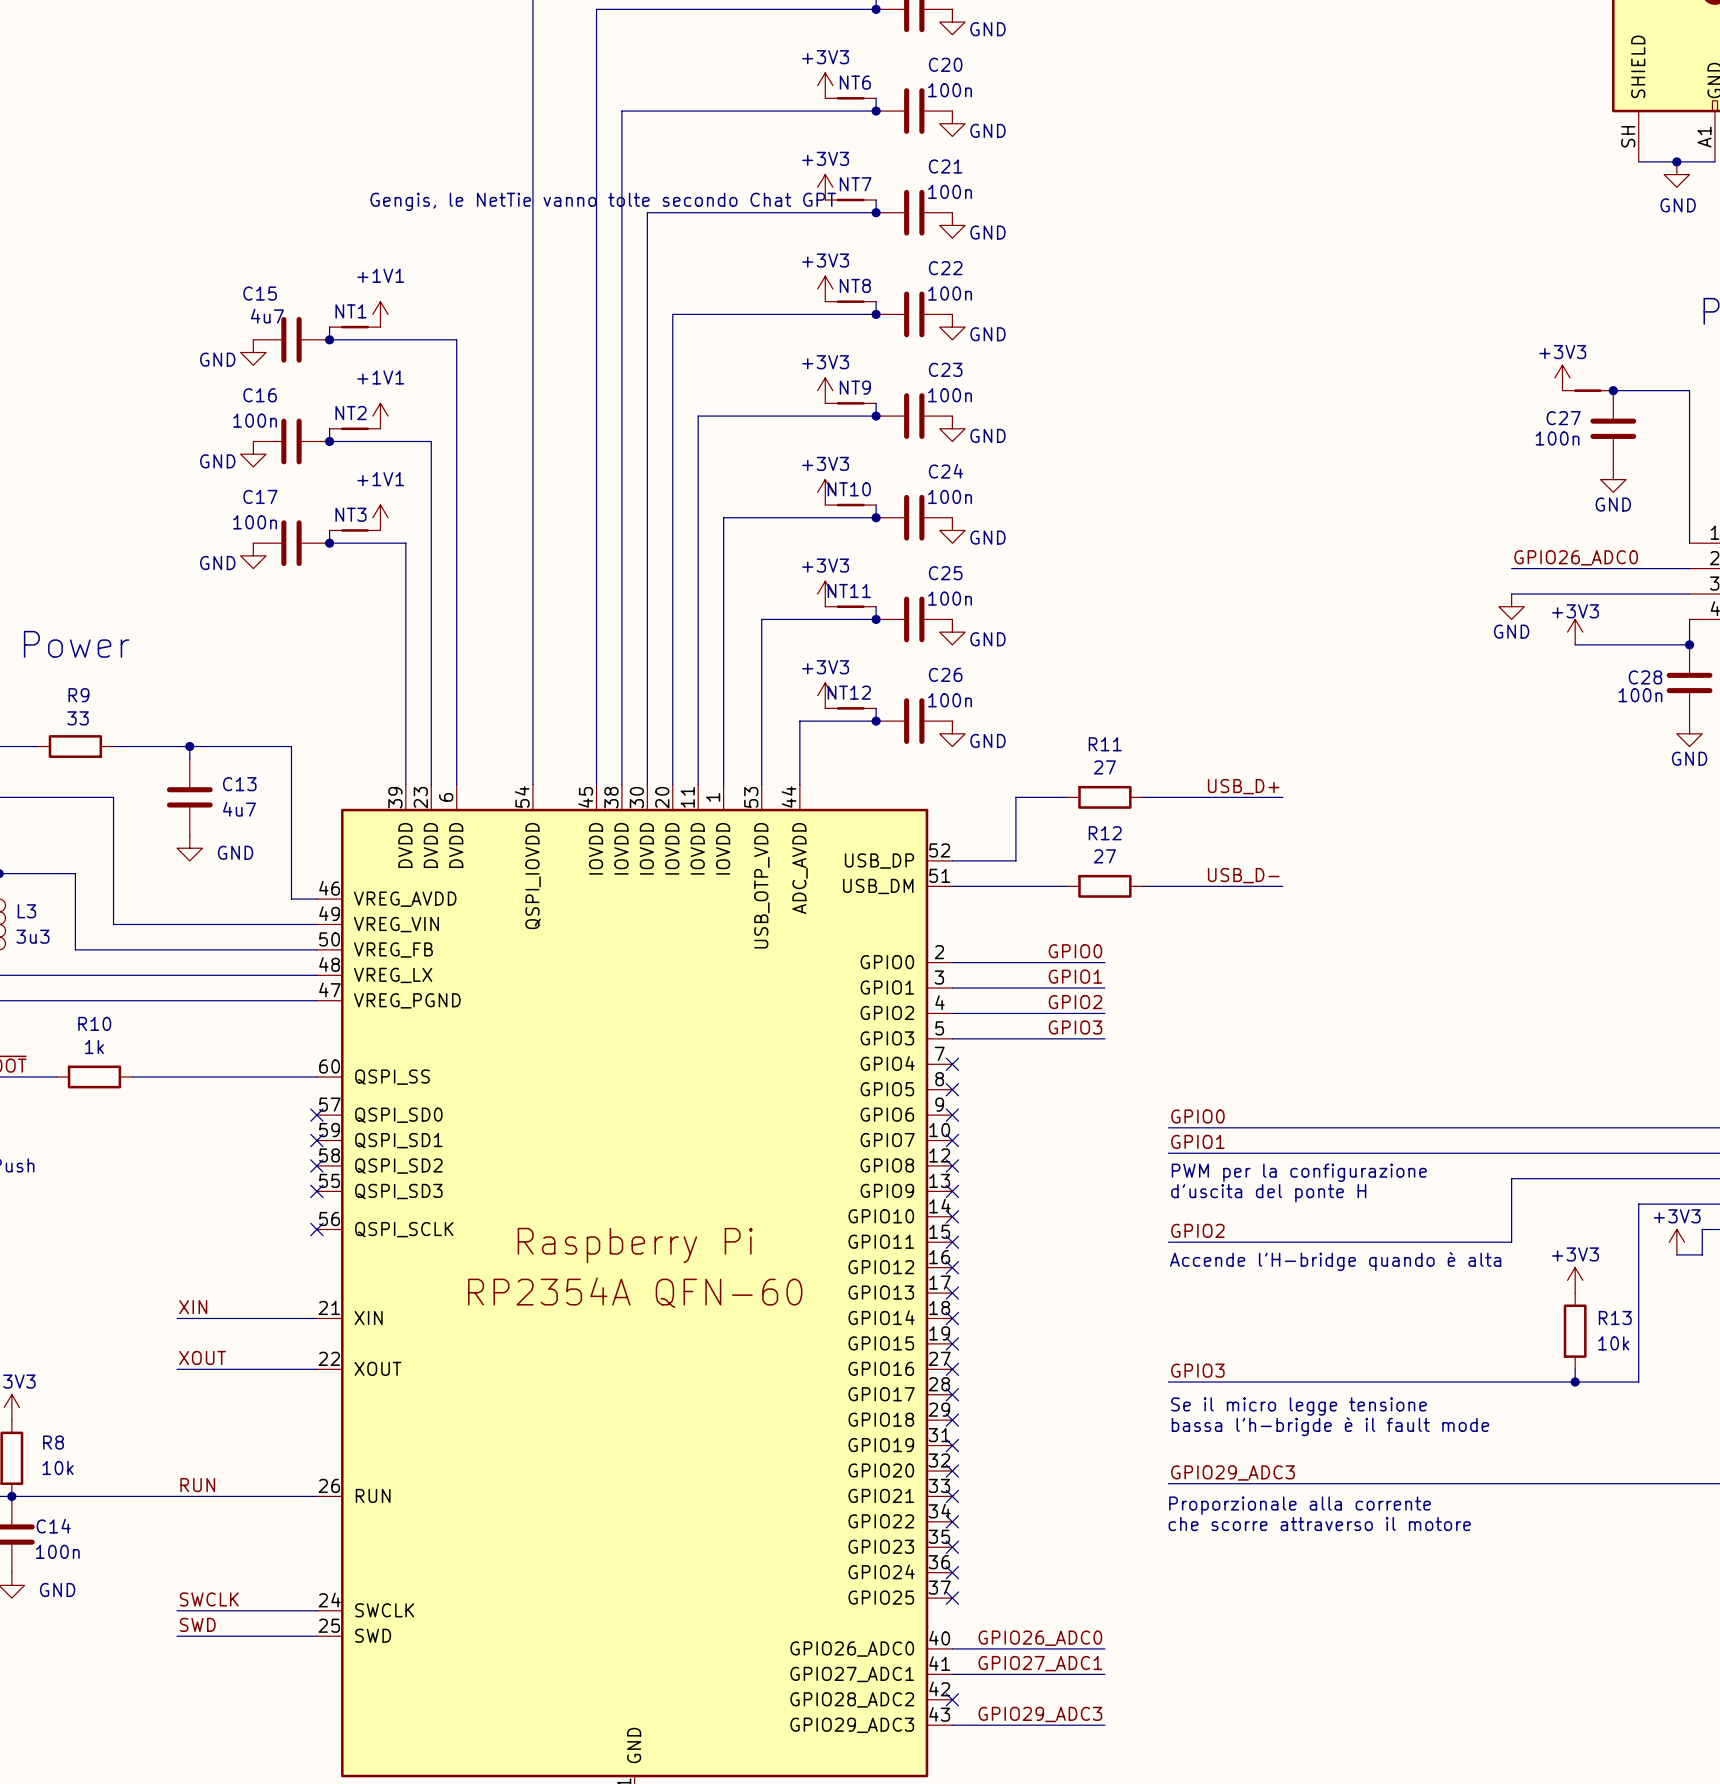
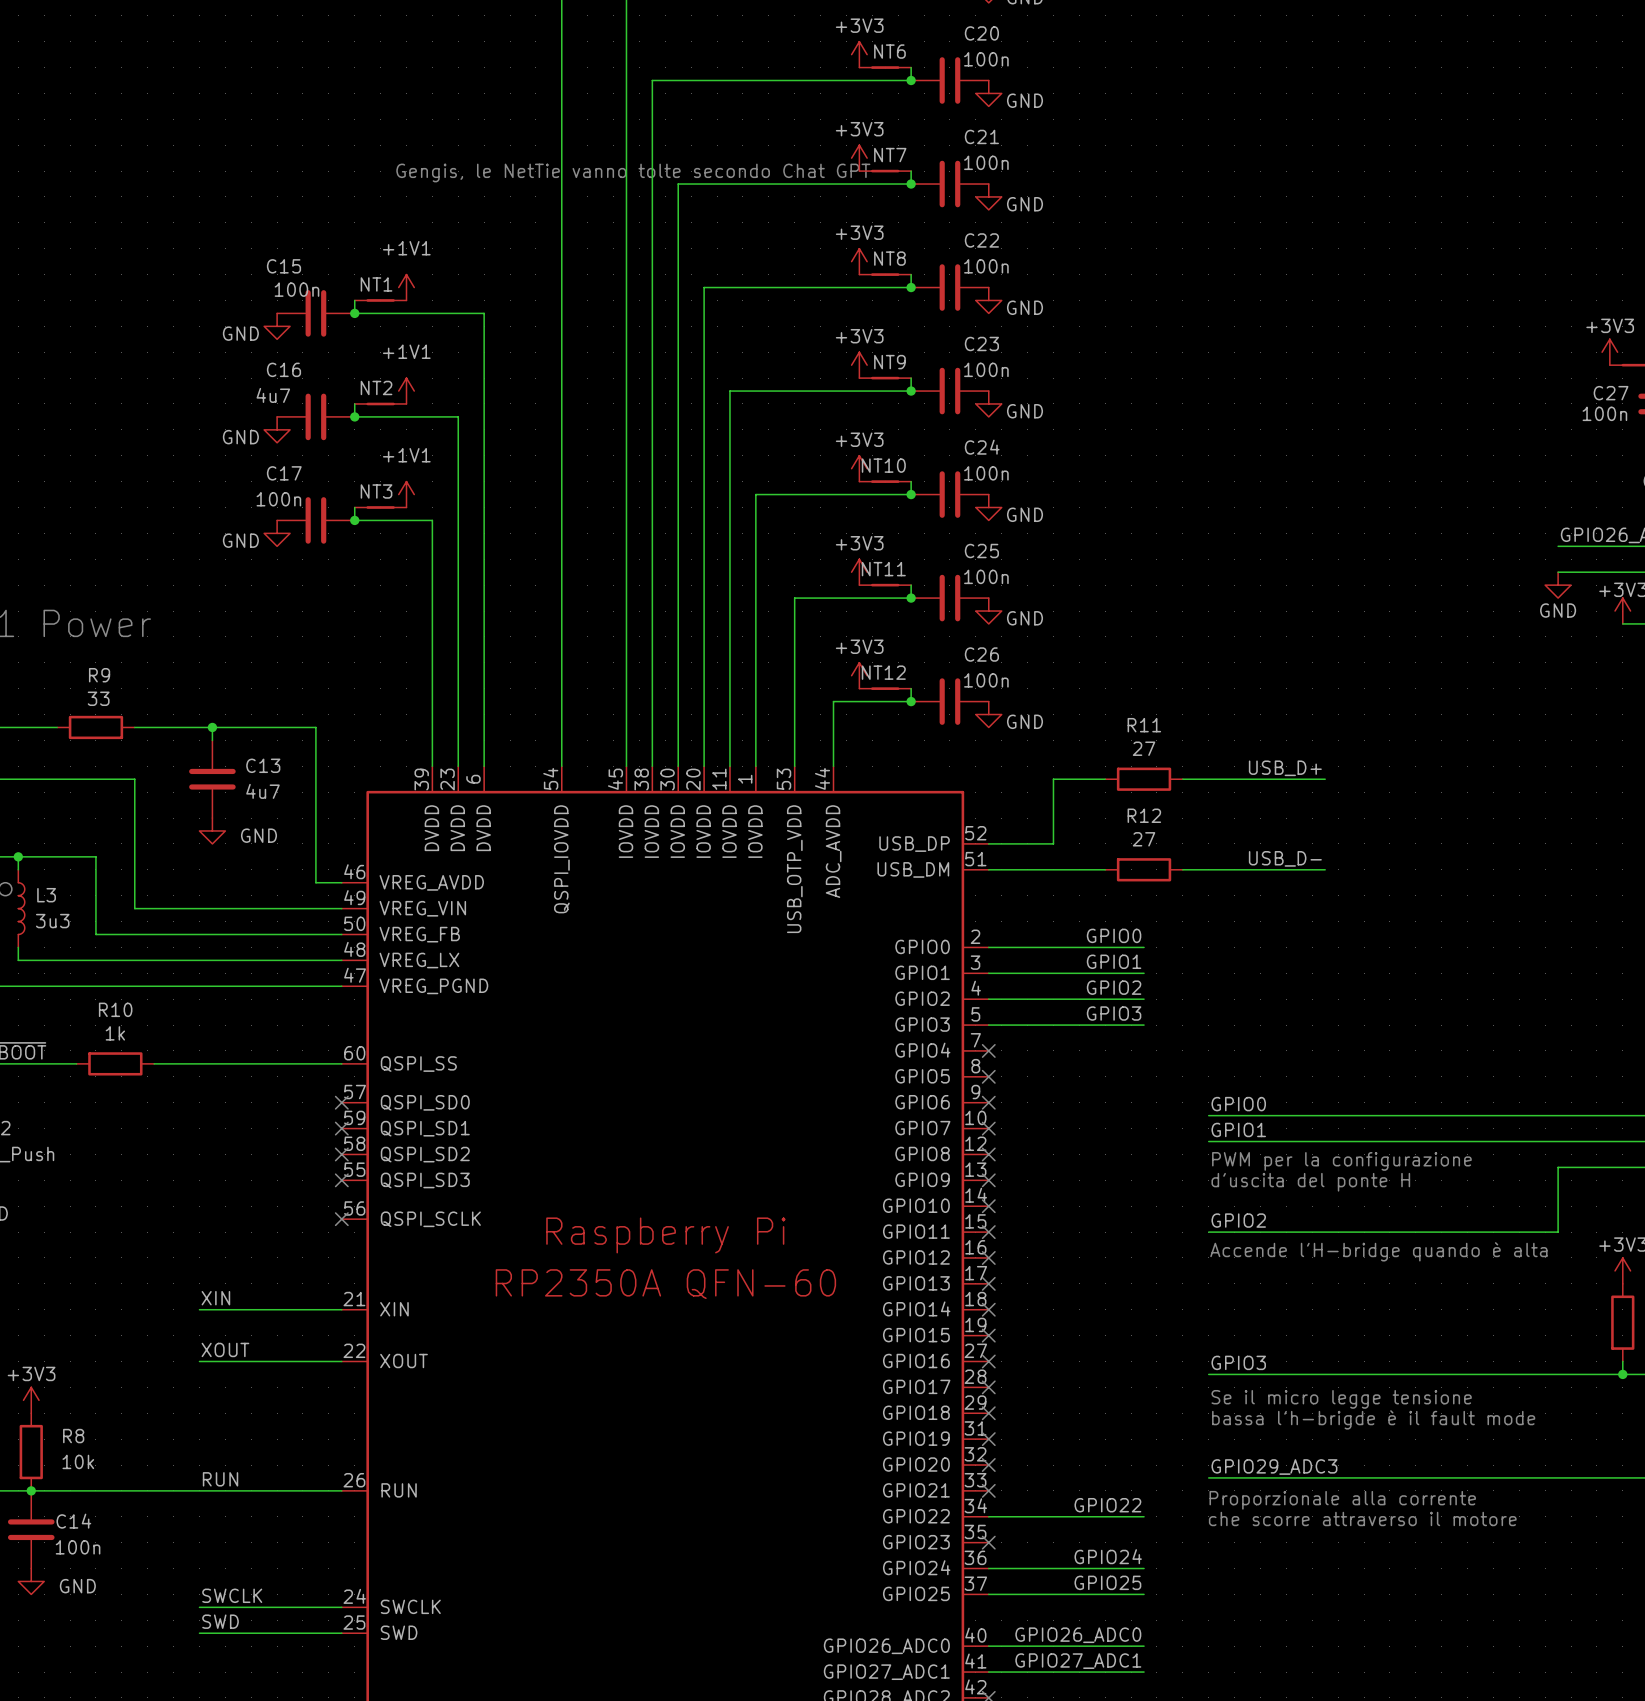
C15 value: 4u7 (267, 316) -> 100n (296, 289)
C16 value: 100n (255, 420) -> 4u7 (273, 395)
part text: RP2354A QFN-60 (635, 1292) -> RP2350A QFN-60 (665, 1284)
label: none -> GPIO22 (1107, 1505)
wire: none -> (988, 1516) (1144, 1516)
no-connect mark: (952, 1521) -> none
label: none -> GPIO24 (1108, 1556)
wire: none -> (988, 1568) (1144, 1568)
no-connect mark: (952, 1572) -> none
label: none -> GPIO25 (1107, 1582)
wire: none -> (988, 1594) (1144, 1594)
no-connect mark: (952, 1598) -> none

